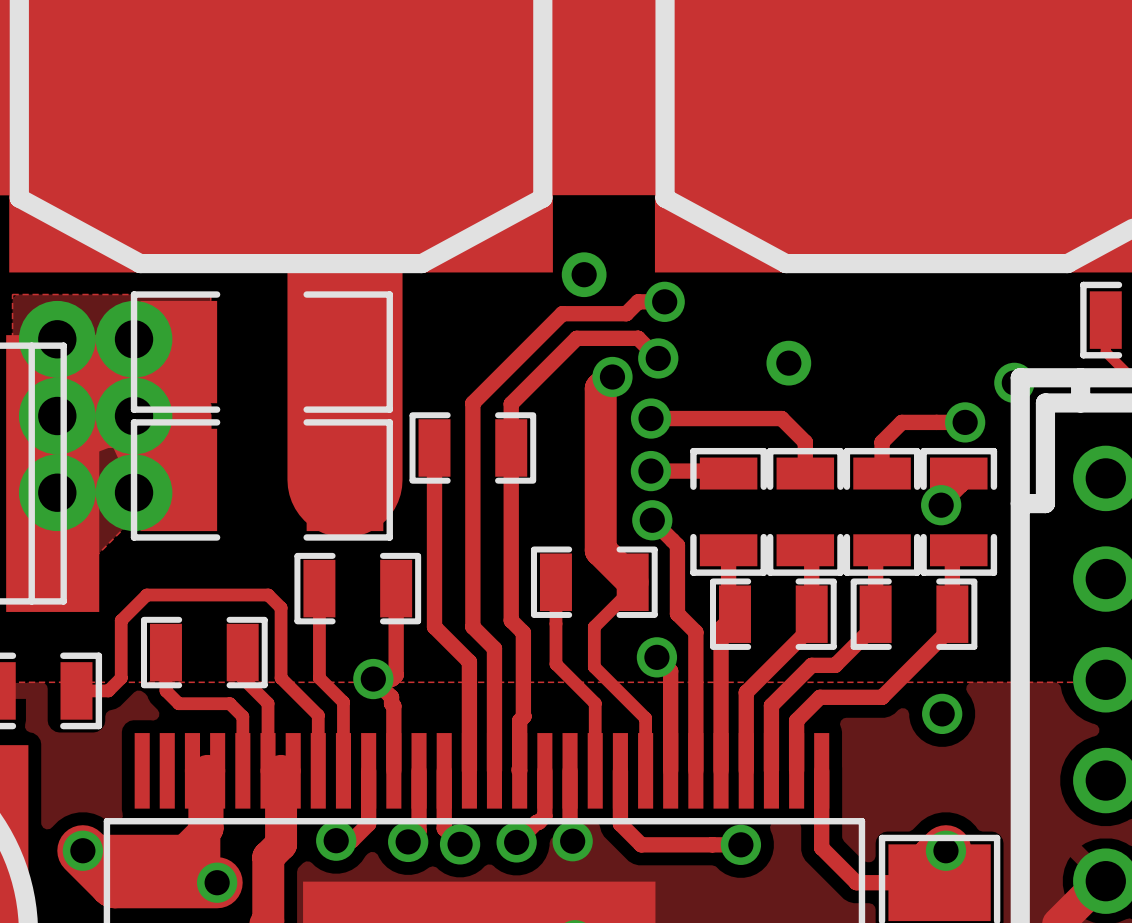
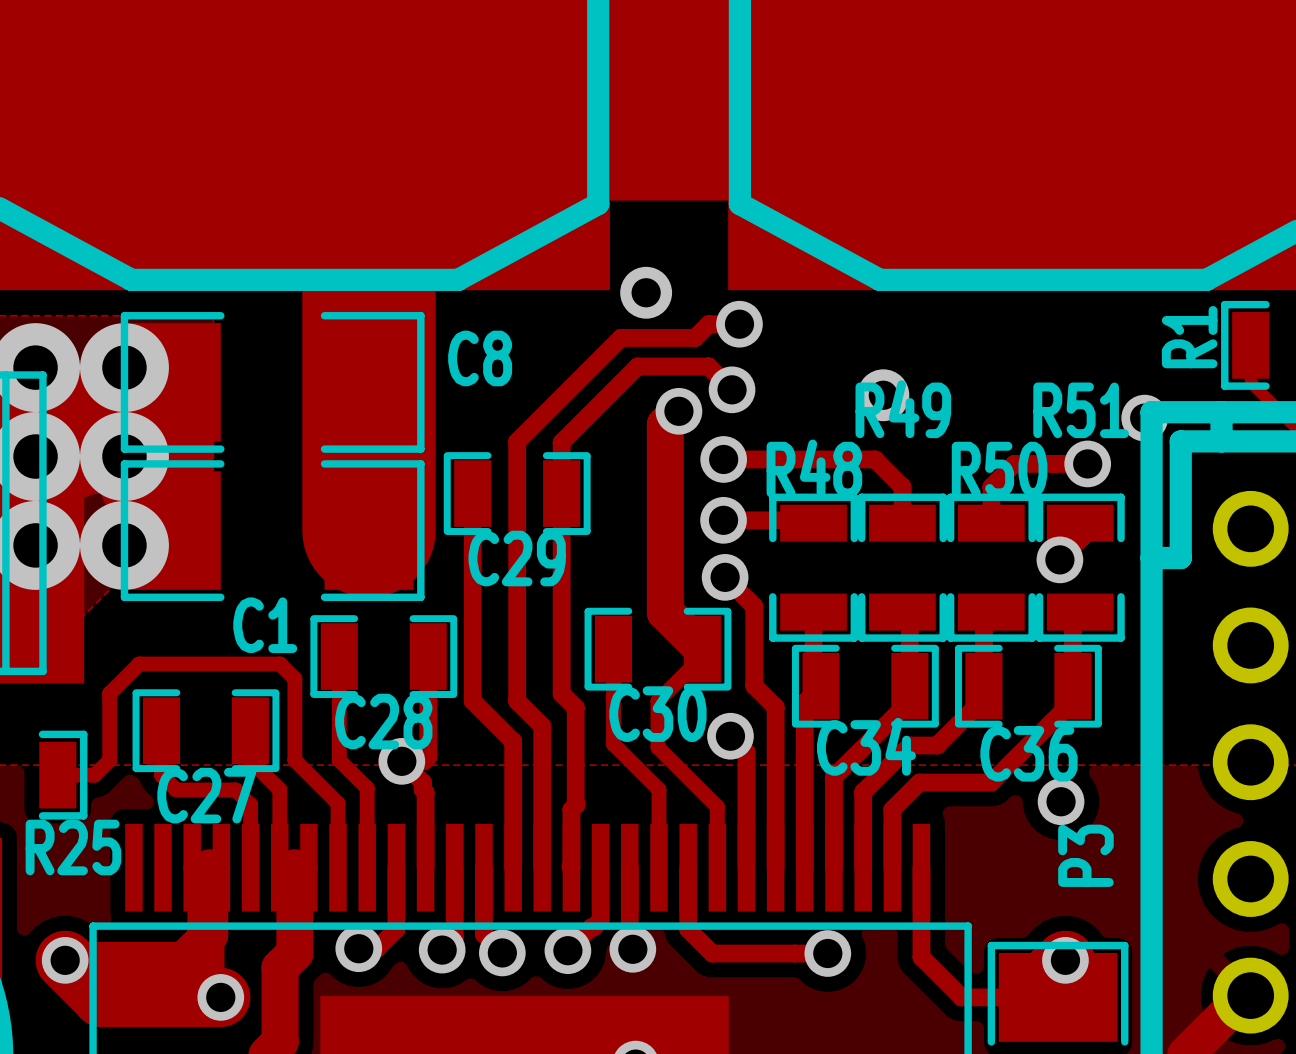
R1 name: none -> R1 (1189, 337)
C8 name: none -> C8 (480, 358)
R49 name: none -> R49 (903, 409)
R51 name: none -> R51 (1081, 410)
R48 name: none -> R48 (814, 468)
R50 name: none -> R50 (999, 469)
C29 name: none -> C29 (517, 558)
C1 name: none -> C1 (265, 625)
C30 name: none -> C30 (657, 714)
C28 name: none -> C28 (383, 721)
C34 name: none -> C34 (866, 746)
C36 name: none -> C36 (1029, 753)
C27 name: none -> C27 (206, 795)
R25 name: none -> R25 (73, 847)
P3 name: none -> P3 (1085, 855)

